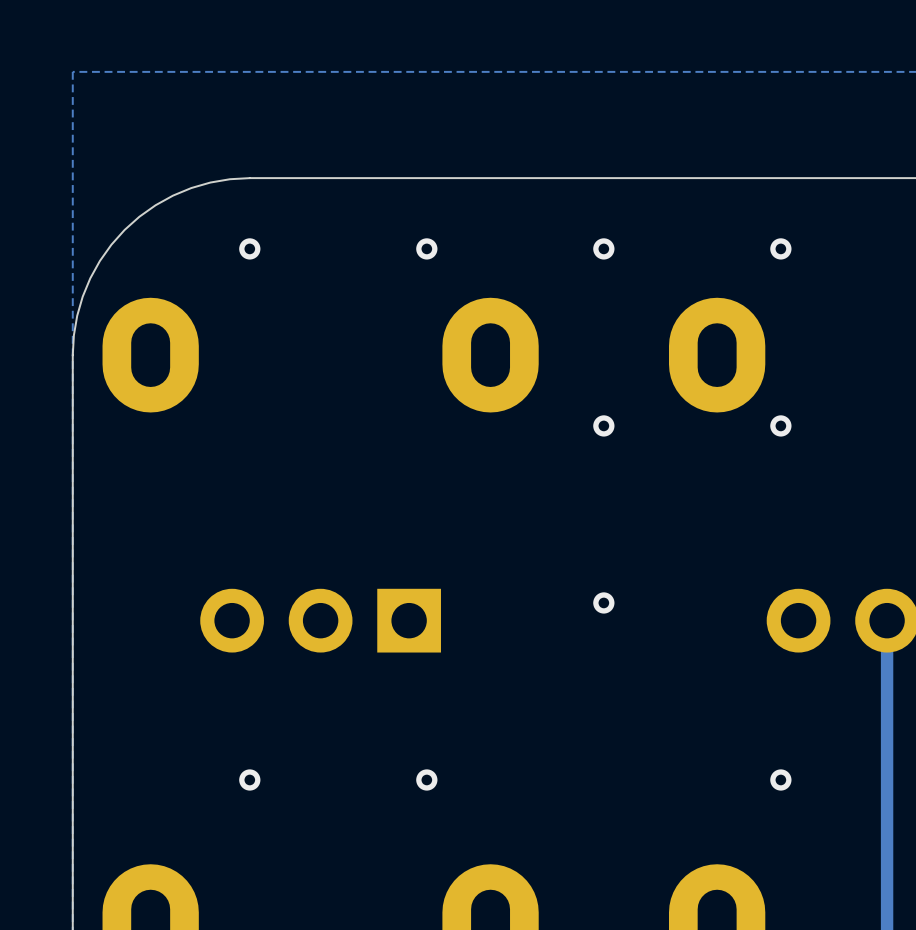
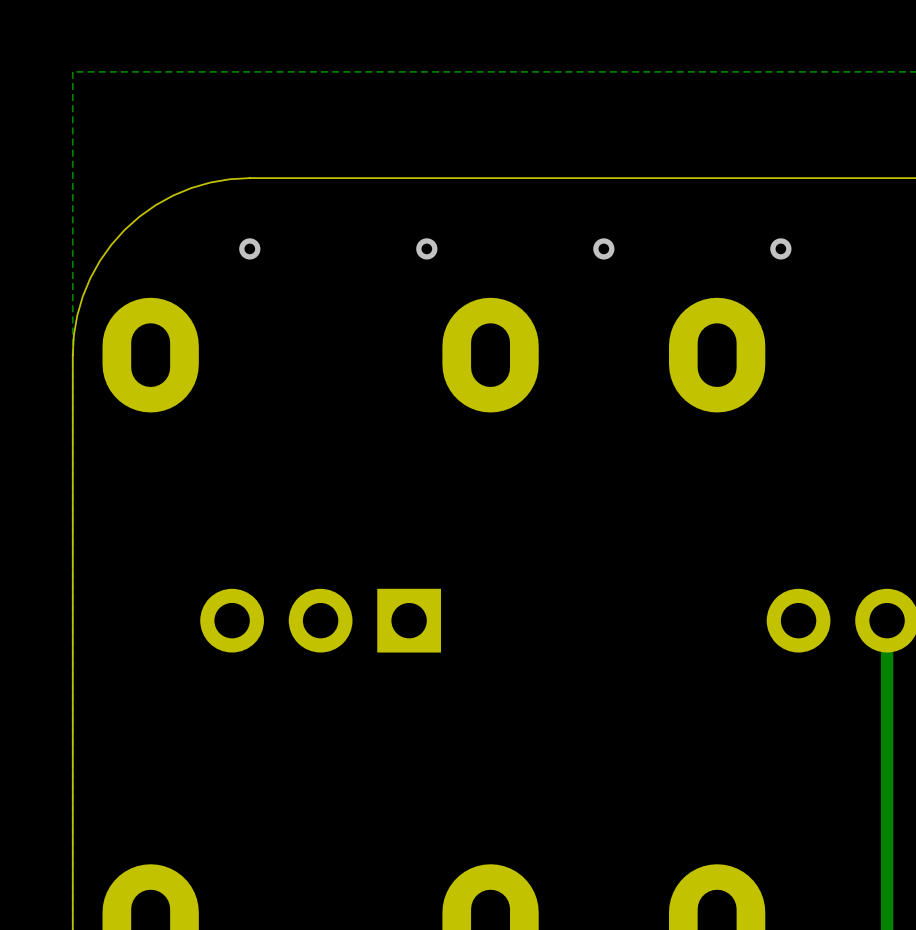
via: (603, 425) -> none
via: (780, 425) -> none
via: (603, 602) -> none
via: (249, 779) -> none
via: (426, 779) -> none
via: (780, 779) -> none

